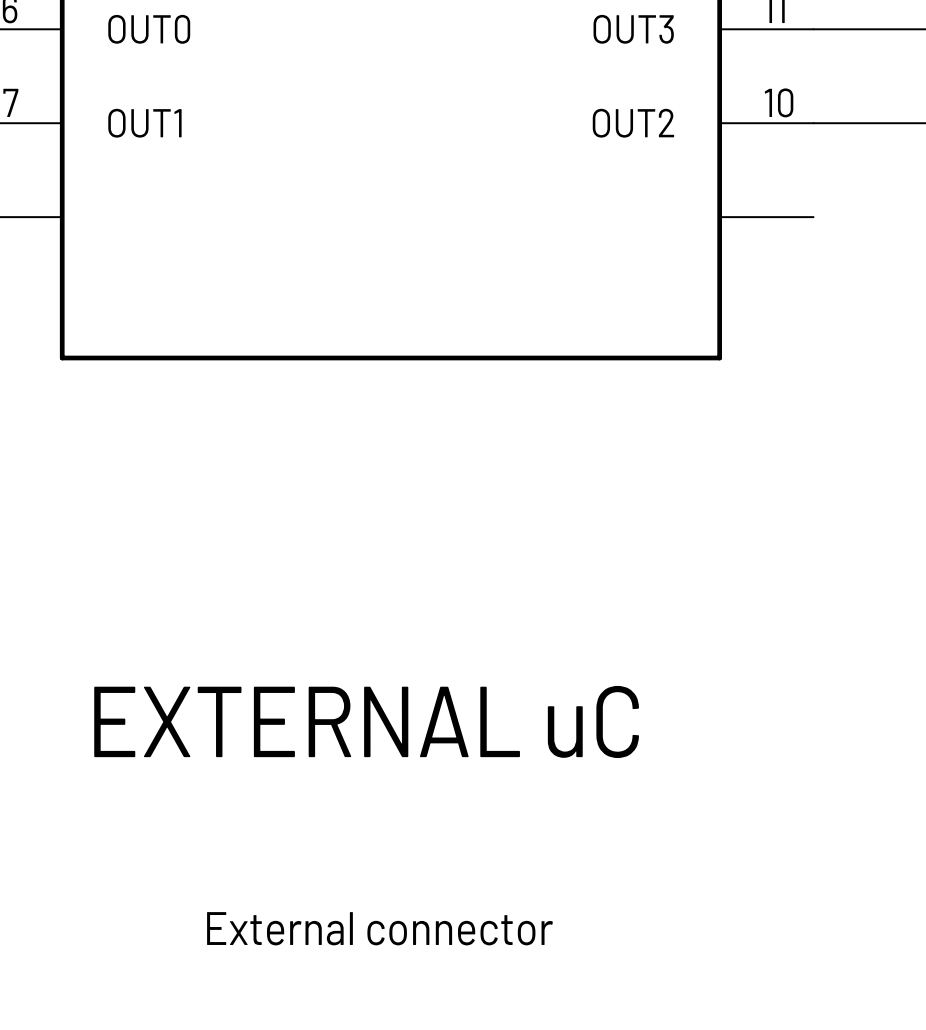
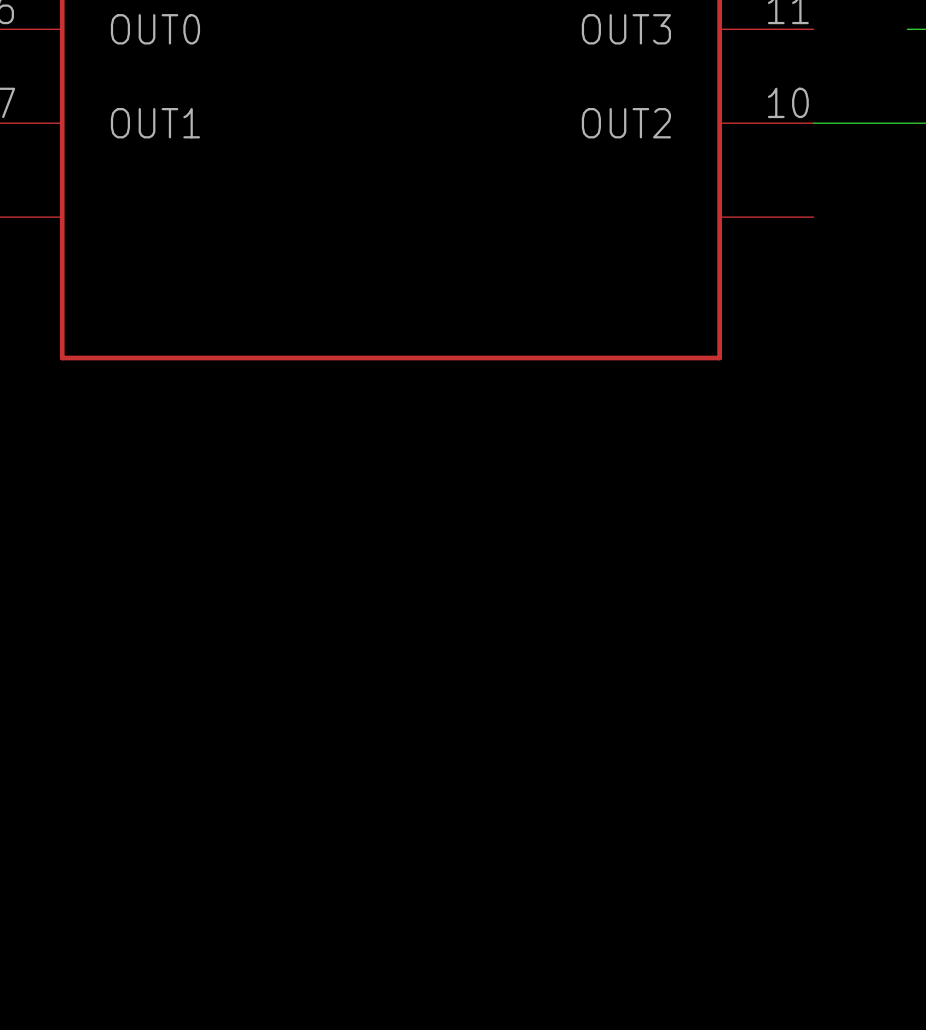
wire: (813, 29) (907, 29) -> none
text: EXTERNAL uC (366, 721) -> none
text: External connector (379, 928) -> none

